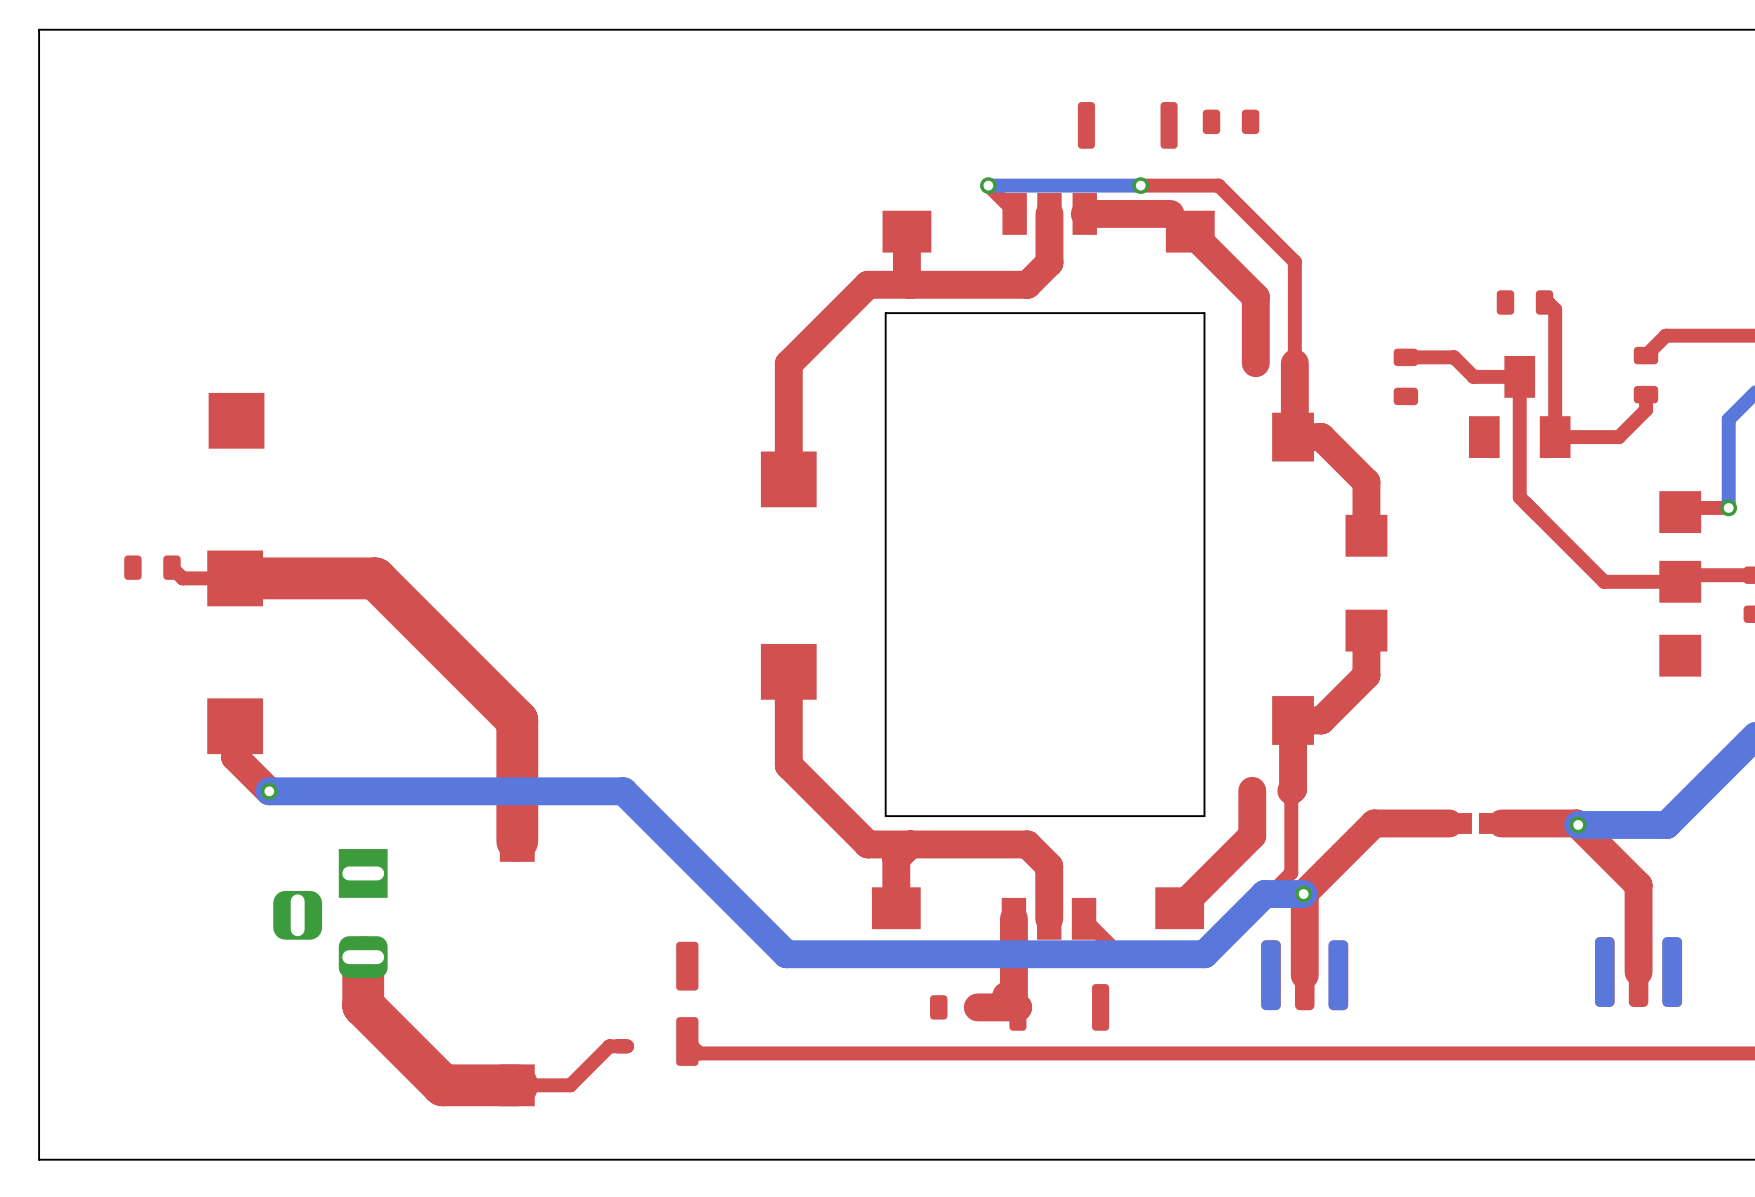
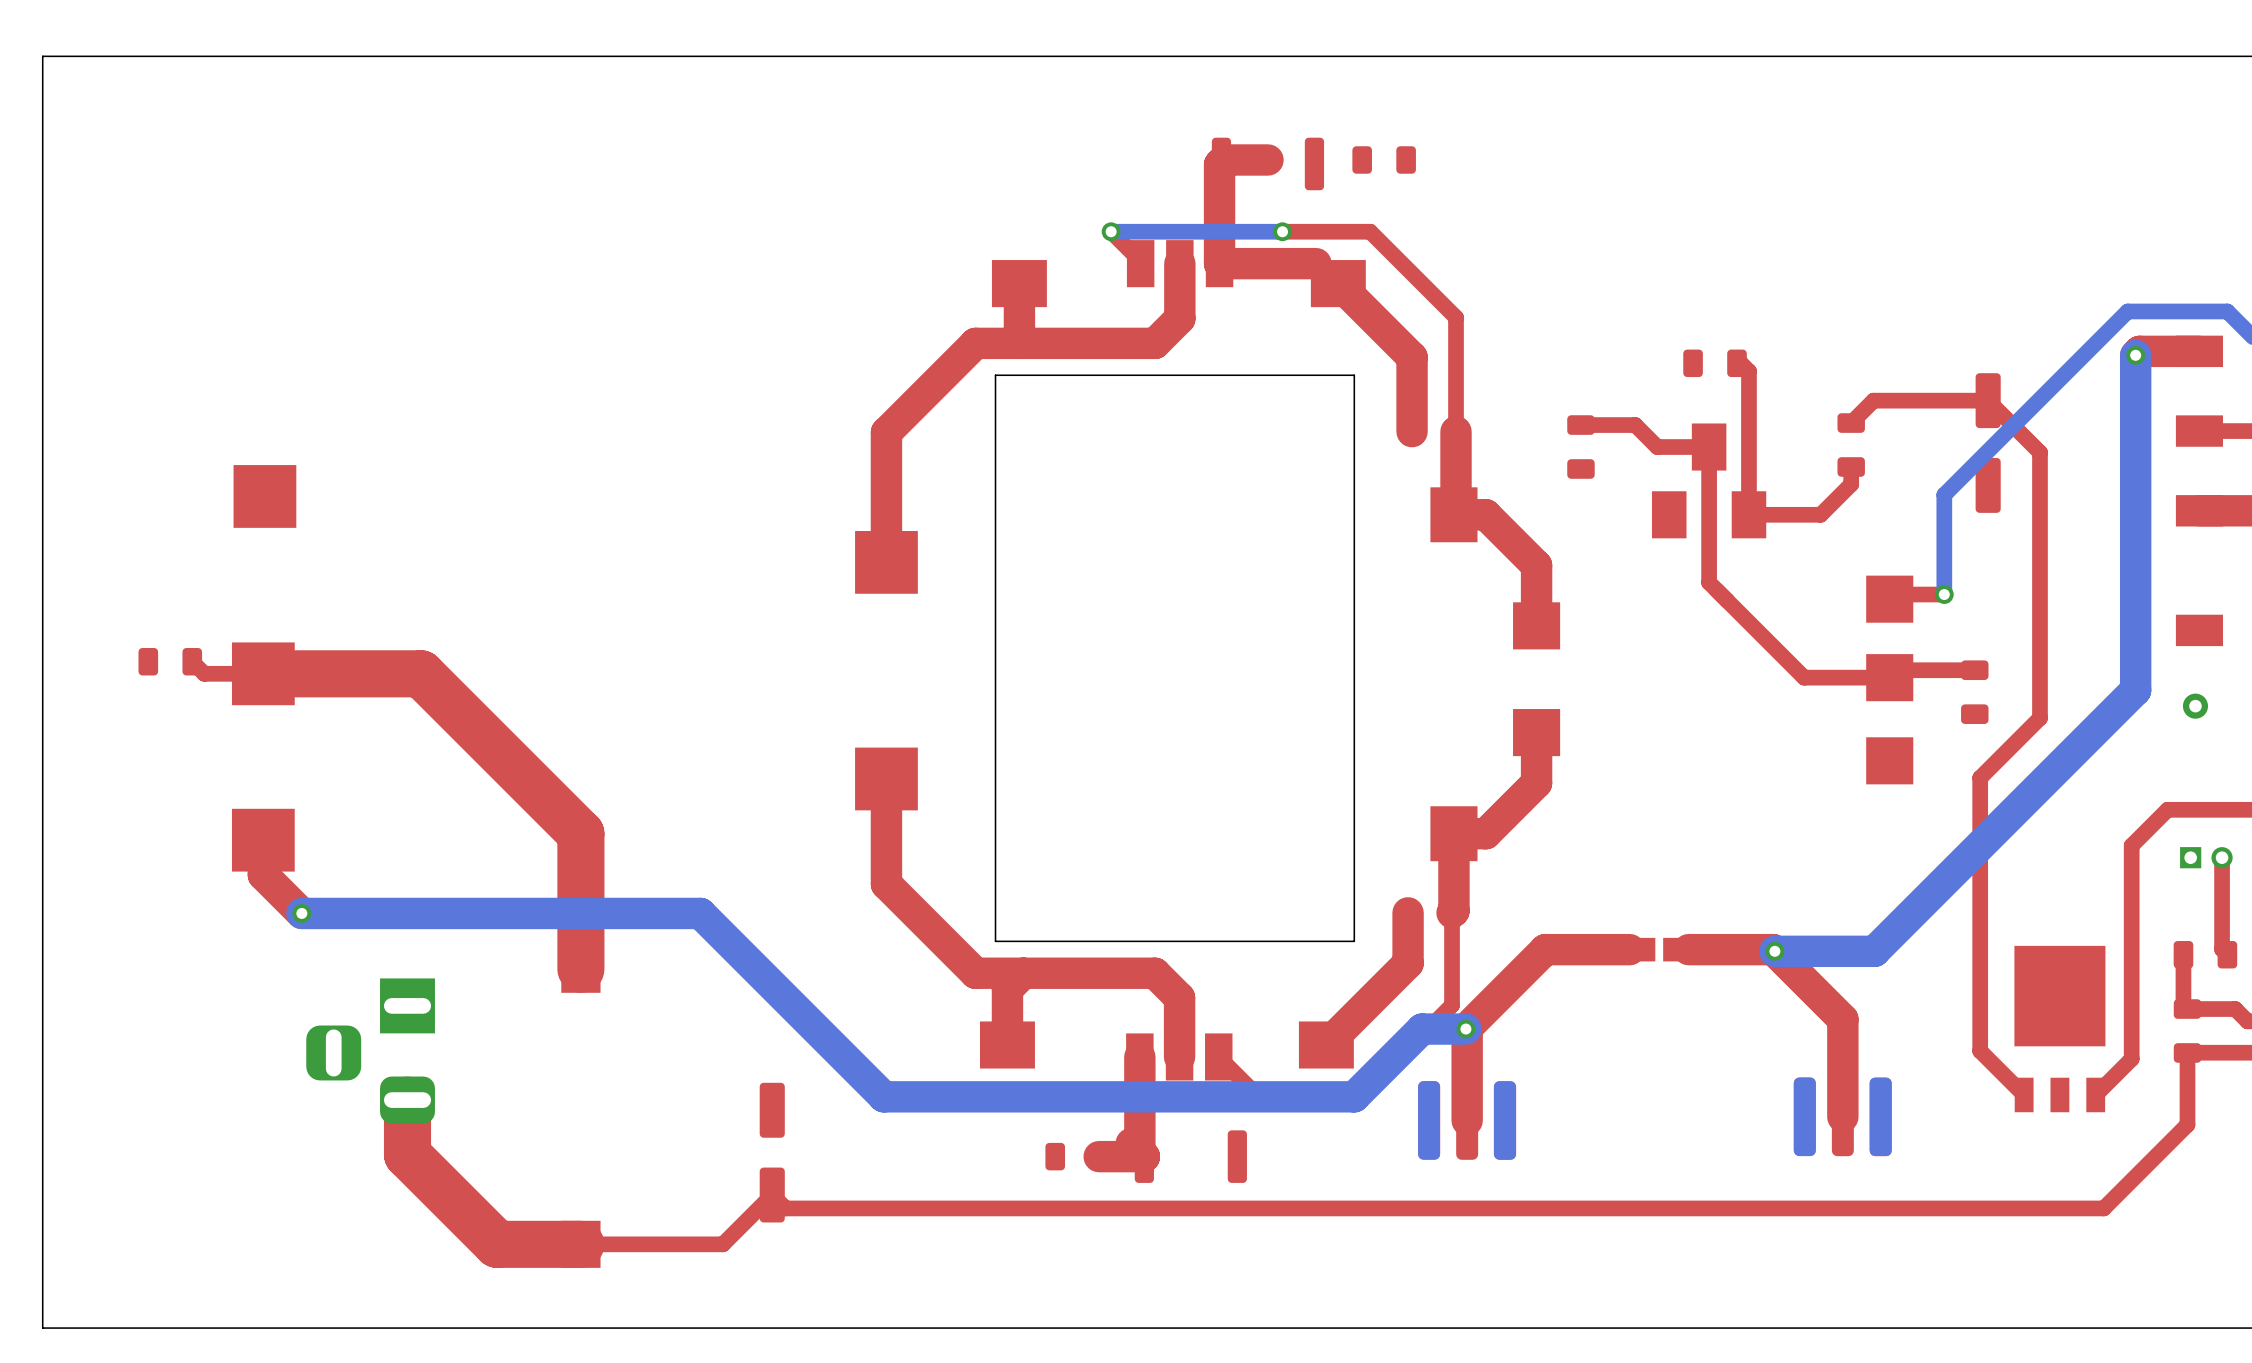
top track: none -> (1268, 159) (1224, 159) (1219, 164) (1219, 263)
top track: (627, 1046) (609, 1046) (570, 1085) -> (772, 1195) (722, 1244) (640, 1244)

